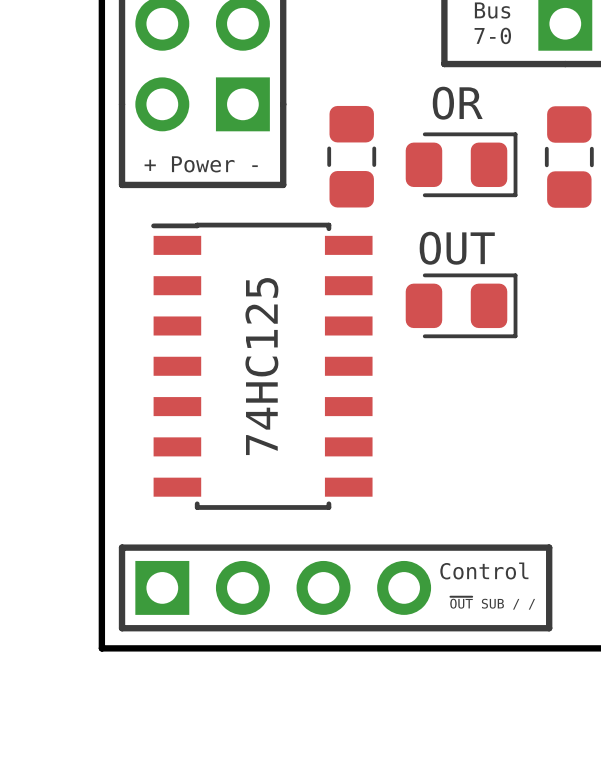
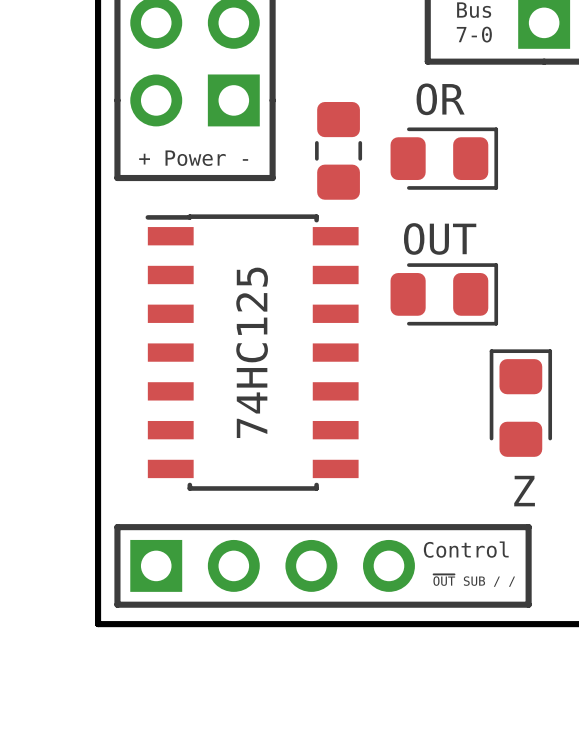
part: (569, 157) -> none
part: none -> Z (520, 403)

